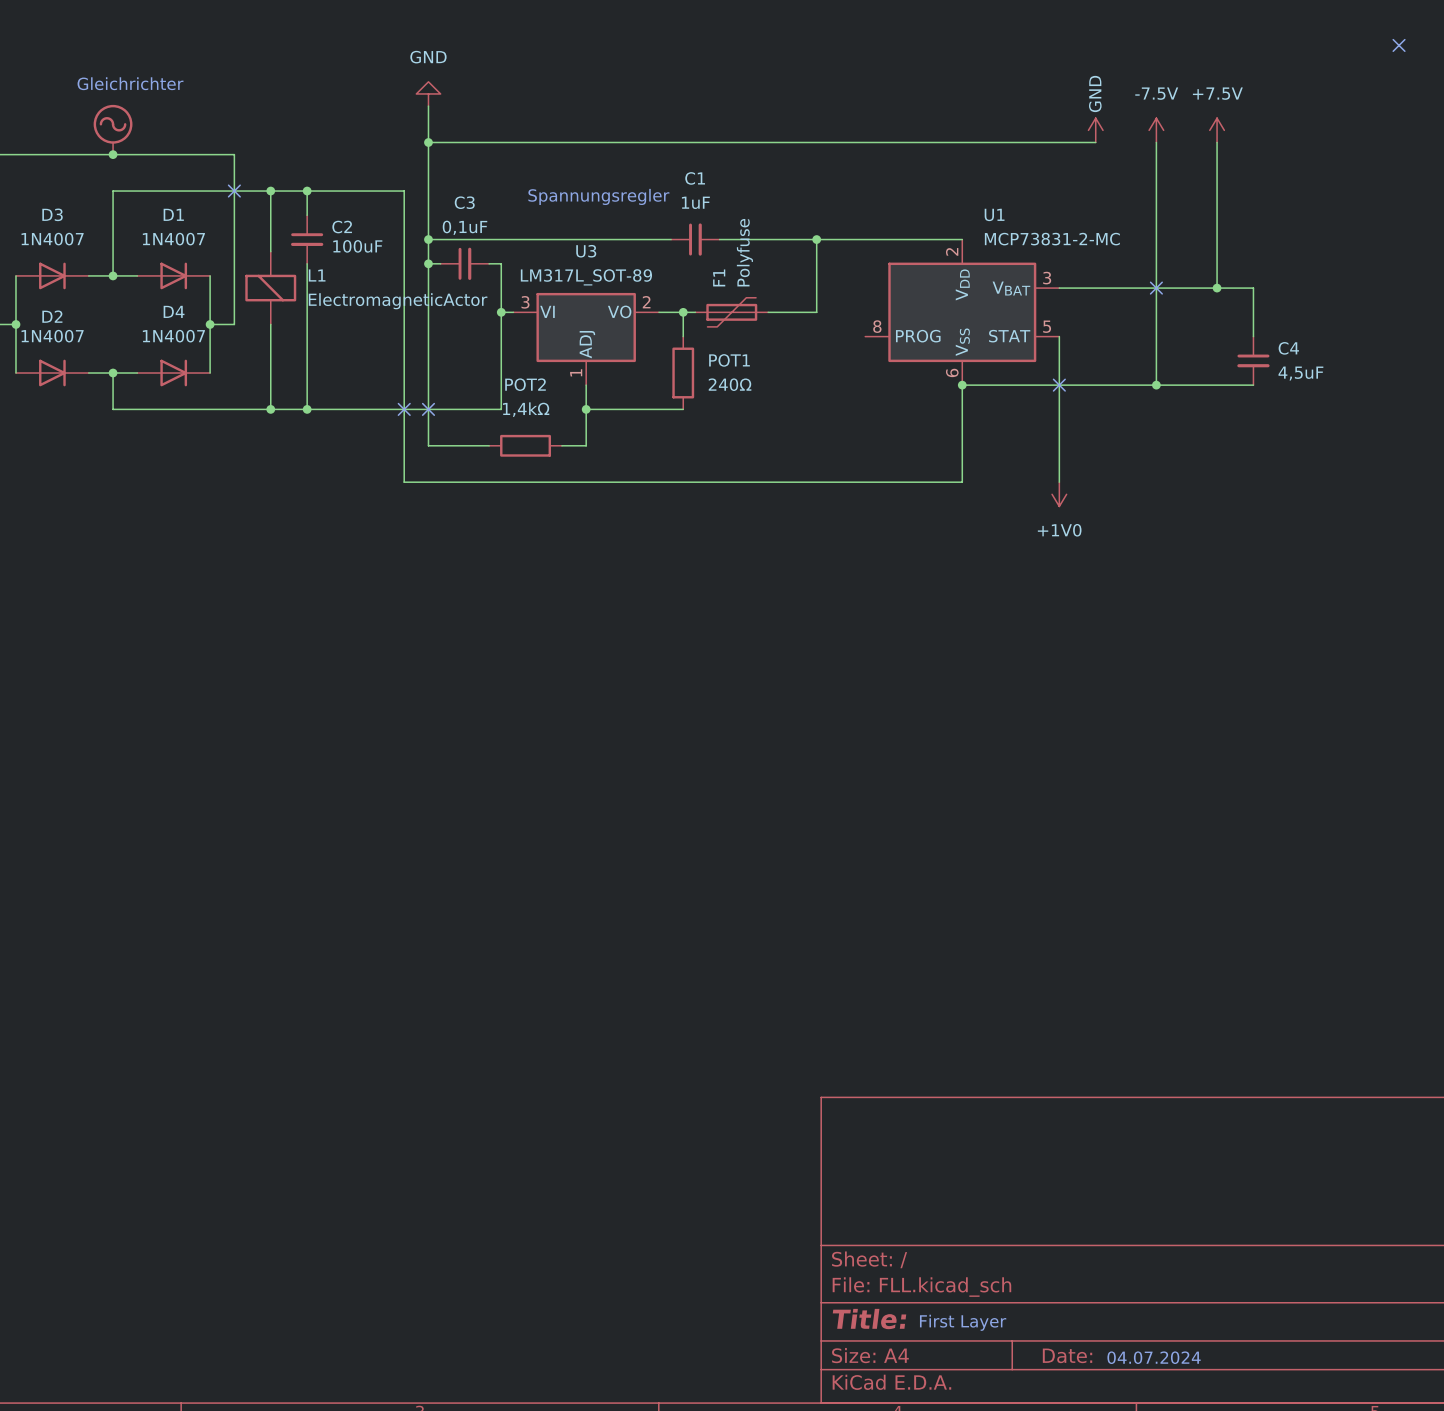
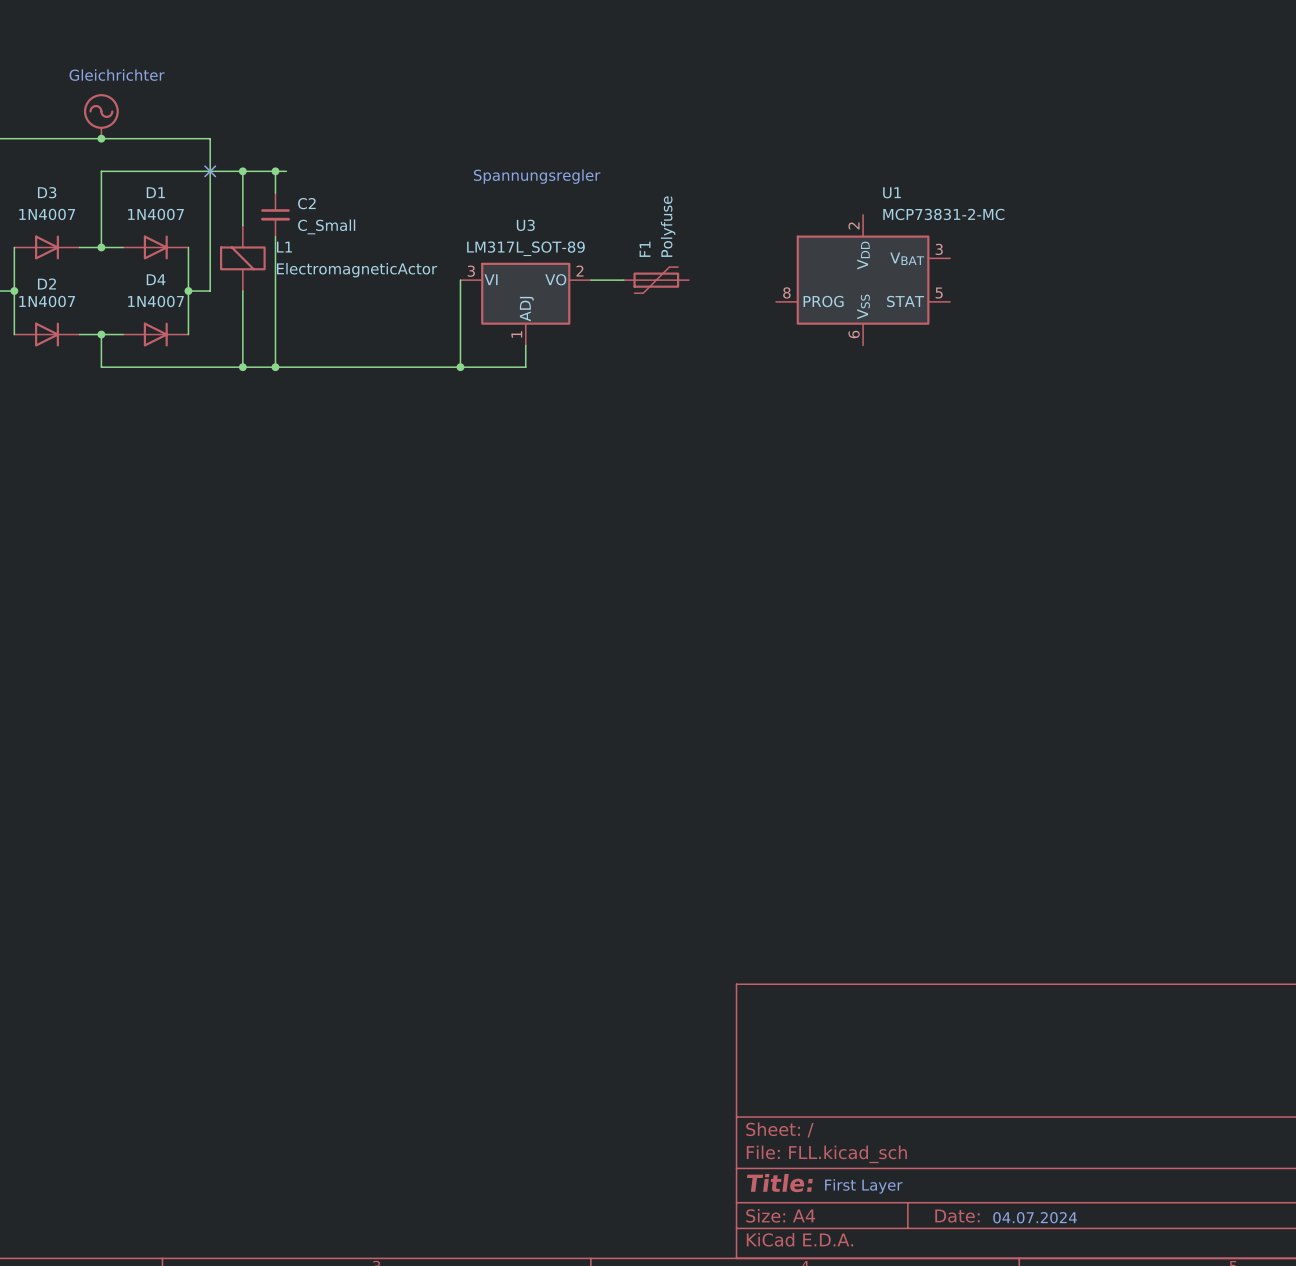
no-connect mark: (1399, 45) -> none
power symbol: GND (428, 93) -> none
wire: (428, 106) (428, 445) (489, 445) -> none
power symbol: GND (1095, 130) -> none
power symbol: -7.5V (1156, 130) -> none
power symbol: +7.5V (1217, 130) -> none
wire: (428, 142) (1095, 142) -> none
junction: (428, 142) -> none
wire: (1156, 142) (1156, 385) -> none
wire: (1217, 142) (1217, 288) -> none
wire: (319, 191) (404, 191) (404, 482) (962, 482) (962, 385) (1253, 385) -> none
wire: (428, 239) (671, 239) -> none
junction: (428, 239) -> none
C1: 1uF (695, 239) -> none
wire: (719, 239) (962, 239) -> none
wire: (816, 239) (816, 312) (768, 312) -> none
junction: (816, 239) -> none
C2 value: 100uF (357, 246) -> C_Small (326, 226)
wire: (428, 263) (440, 263) -> none
junction: (428, 263) -> none
C3: 0,1uF (464, 263) -> none
wire: (489, 263) (501, 263) (501, 409) -> (525, 367) (449, 367)
wire: (1059, 288) (1253, 288) (1253, 336) -> none
no-connect mark: (1156, 288) -> none
junction: (1217, 288) -> none
wire: (501, 312) (513, 312) -> (460, 367) (460, 280)
junction: (501, 312) -> none
wire: (683, 312) (683, 336) -> none
junction: (683, 312) -> none
wire: (1059, 336) (1059, 482) -> none
C4: 4,5uF (1253, 360) -> none
POT1: 240Ω (683, 373) -> none
junction: (962, 385) -> none
no-connect mark: (1059, 385) -> none
junction: (1156, 385) -> none
no-connect mark: (404, 409) -> none
no-connect mark: (428, 409) -> none
junction: none -> (460, 367)
junction: (586, 409) -> none
wire: (683, 409) (586, 409) (586, 445) (561, 445) -> none
POT2: 1,4kΩ (525, 445) -> none
power symbol: +1V0 (1059, 494) -> none

